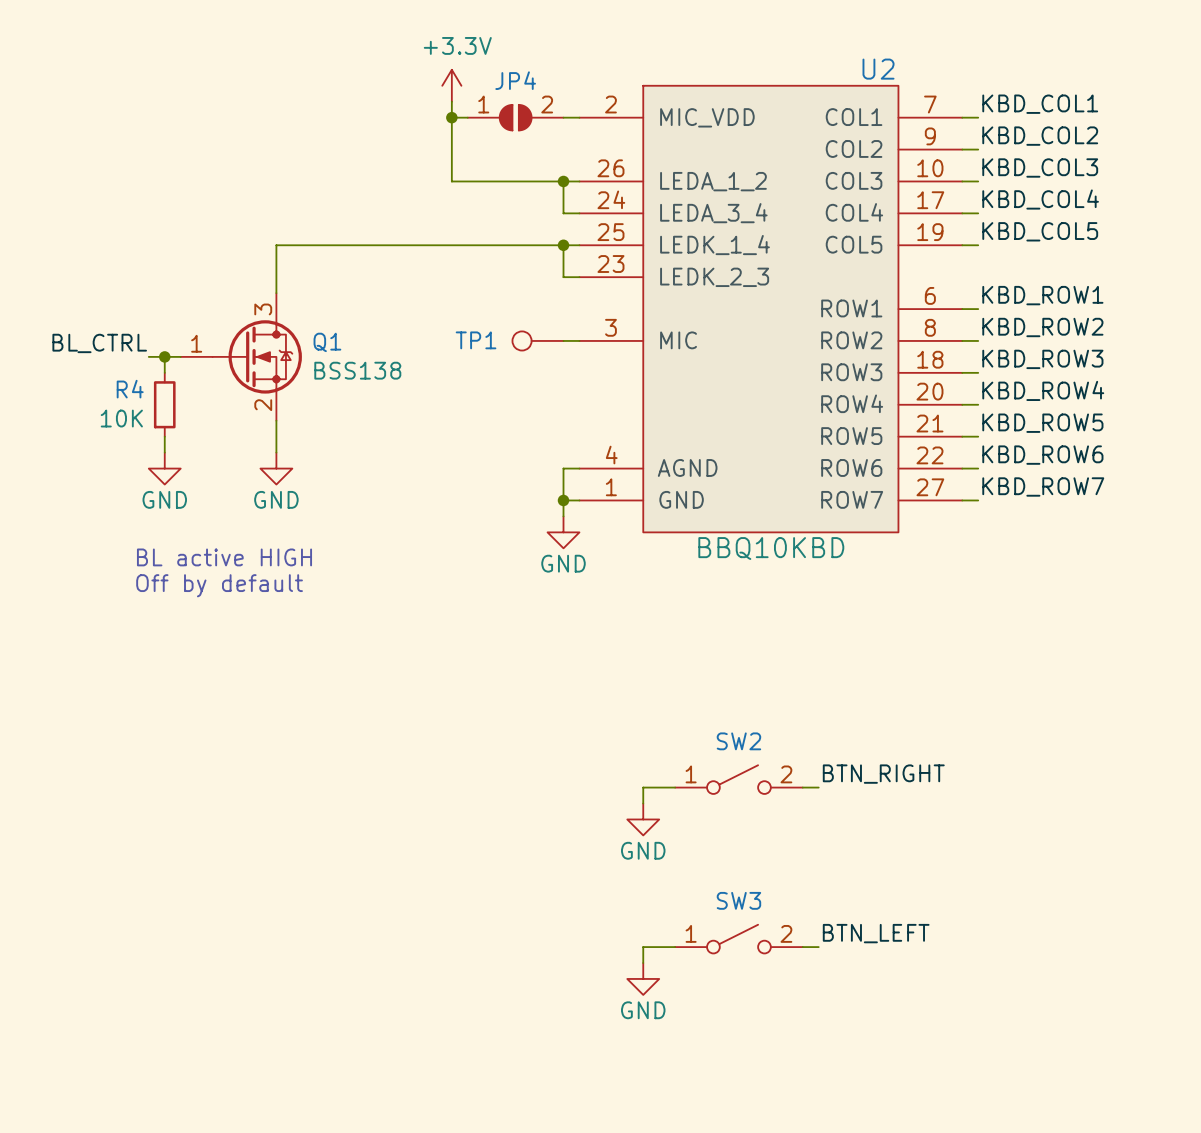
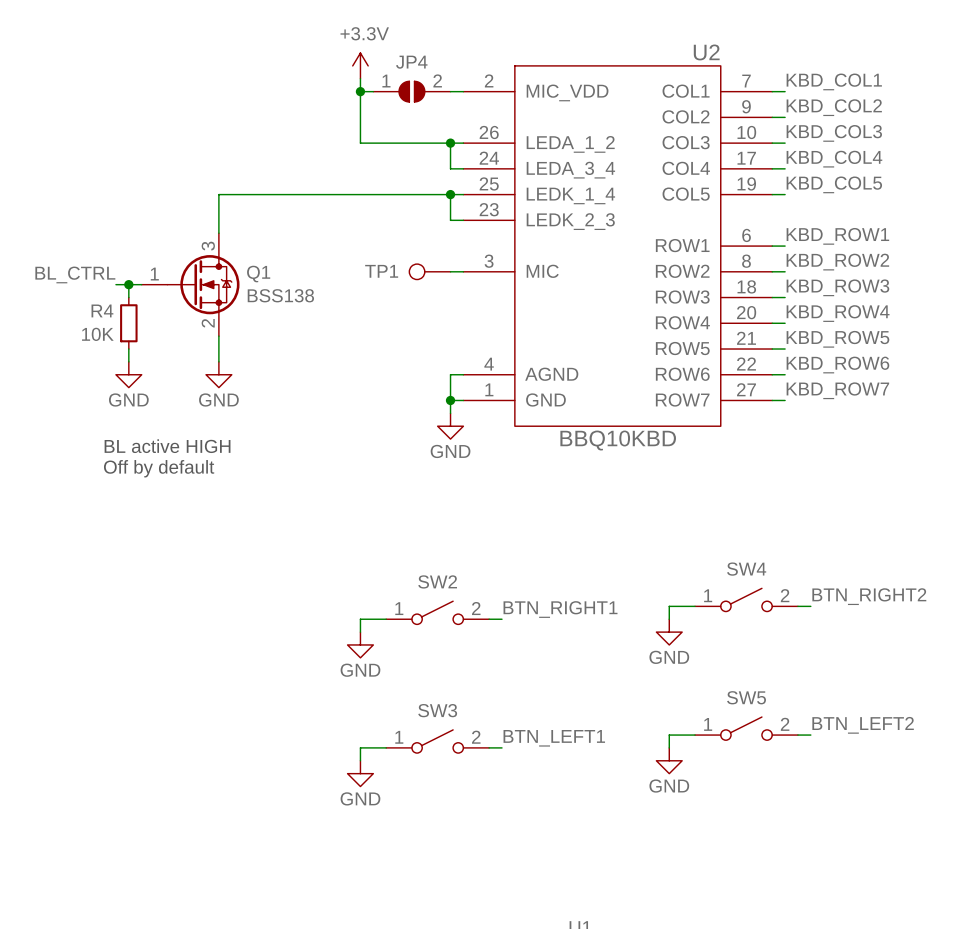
label: none -> BTN_RIGHT2 (869, 596)
SW4: none -> (746, 599)
wire: none -> (695, 606) (669, 606) (669, 619)
wire: none -> (797, 606) (810, 606)
label: none -> BTN_RIGHT1 (560, 609)
label: BTN_RIGHT (883, 774) -> none
SW2 position: (738, 779) -> (437, 612)
wire: (675, 787) (643, 787) (643, 803) -> (386, 619) (360, 619) (360, 632)
wire: (802, 787) (818, 787) -> (489, 619) (502, 619)
power symbol: none -> GND (669, 632)
power symbol: none -> GND (360, 644)
power symbol: GND (643, 819) -> none
label: none -> BTN_LEFT2 (863, 725)
SW5: none -> (746, 728)
wire: none -> (695, 735) (669, 735) (669, 747)
wire: none -> (797, 735) (810, 735)
label: none -> BTN_LEFT1 (554, 738)
label: BTN_LEFT (876, 933) -> none
SW3 position: (738, 939) -> (437, 741)
wire: (675, 947) (643, 947) (643, 963) -> (386, 747) (360, 747) (360, 760)
wire: (802, 947) (818, 947) -> (489, 747) (502, 747)
power symbol: none -> GND (669, 760)
power symbol: none -> GND (360, 773)
power symbol: GND (643, 978) -> none

